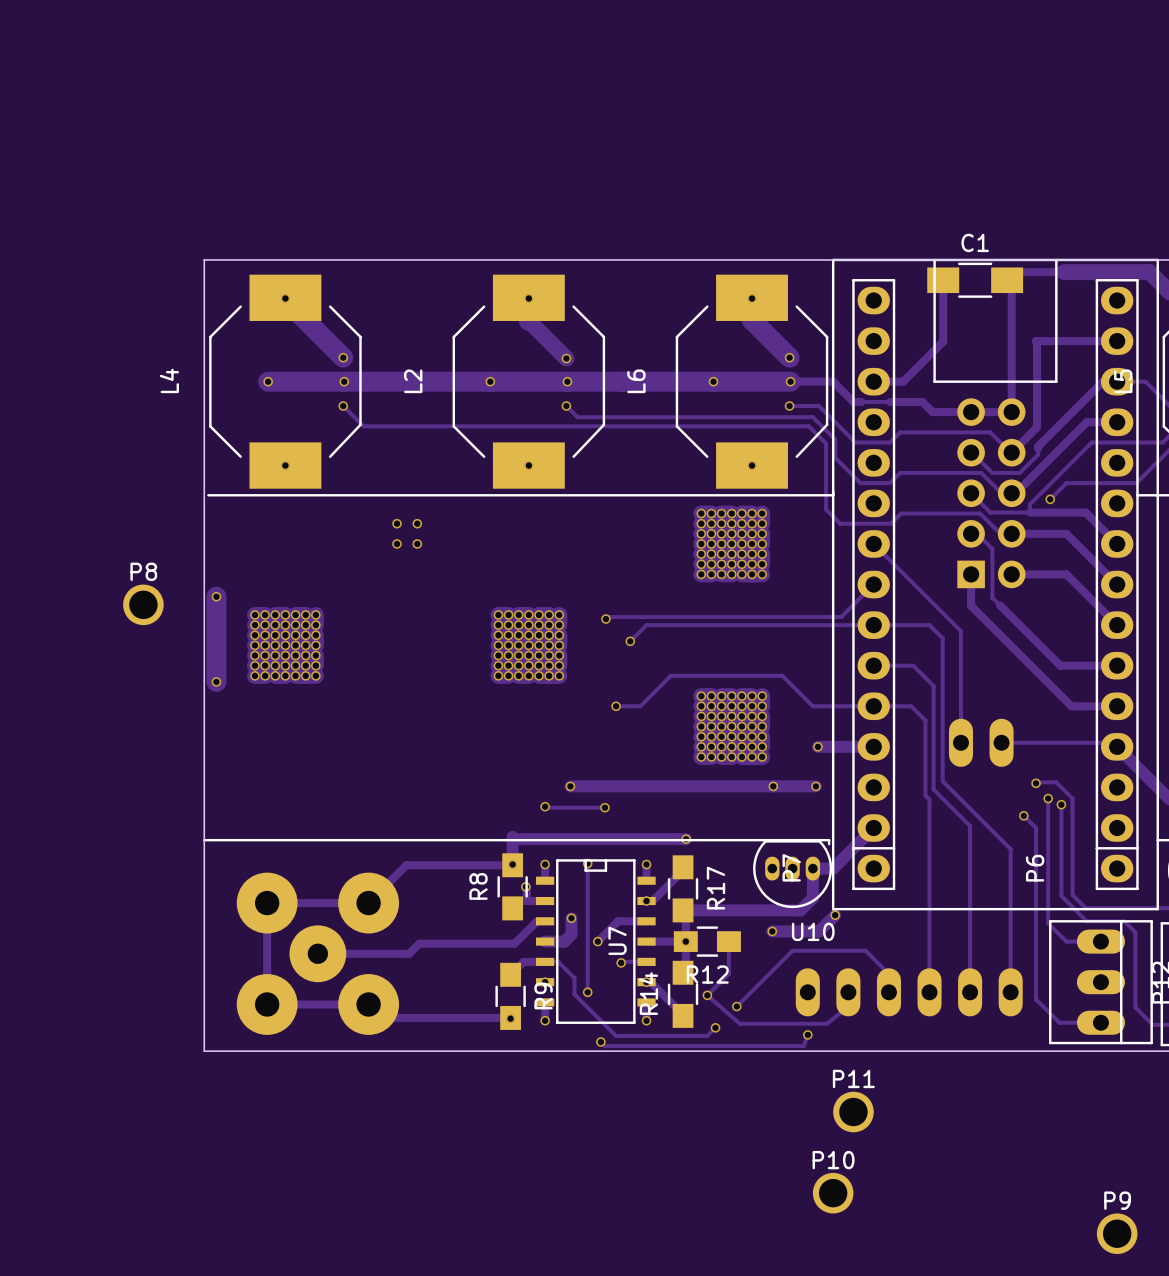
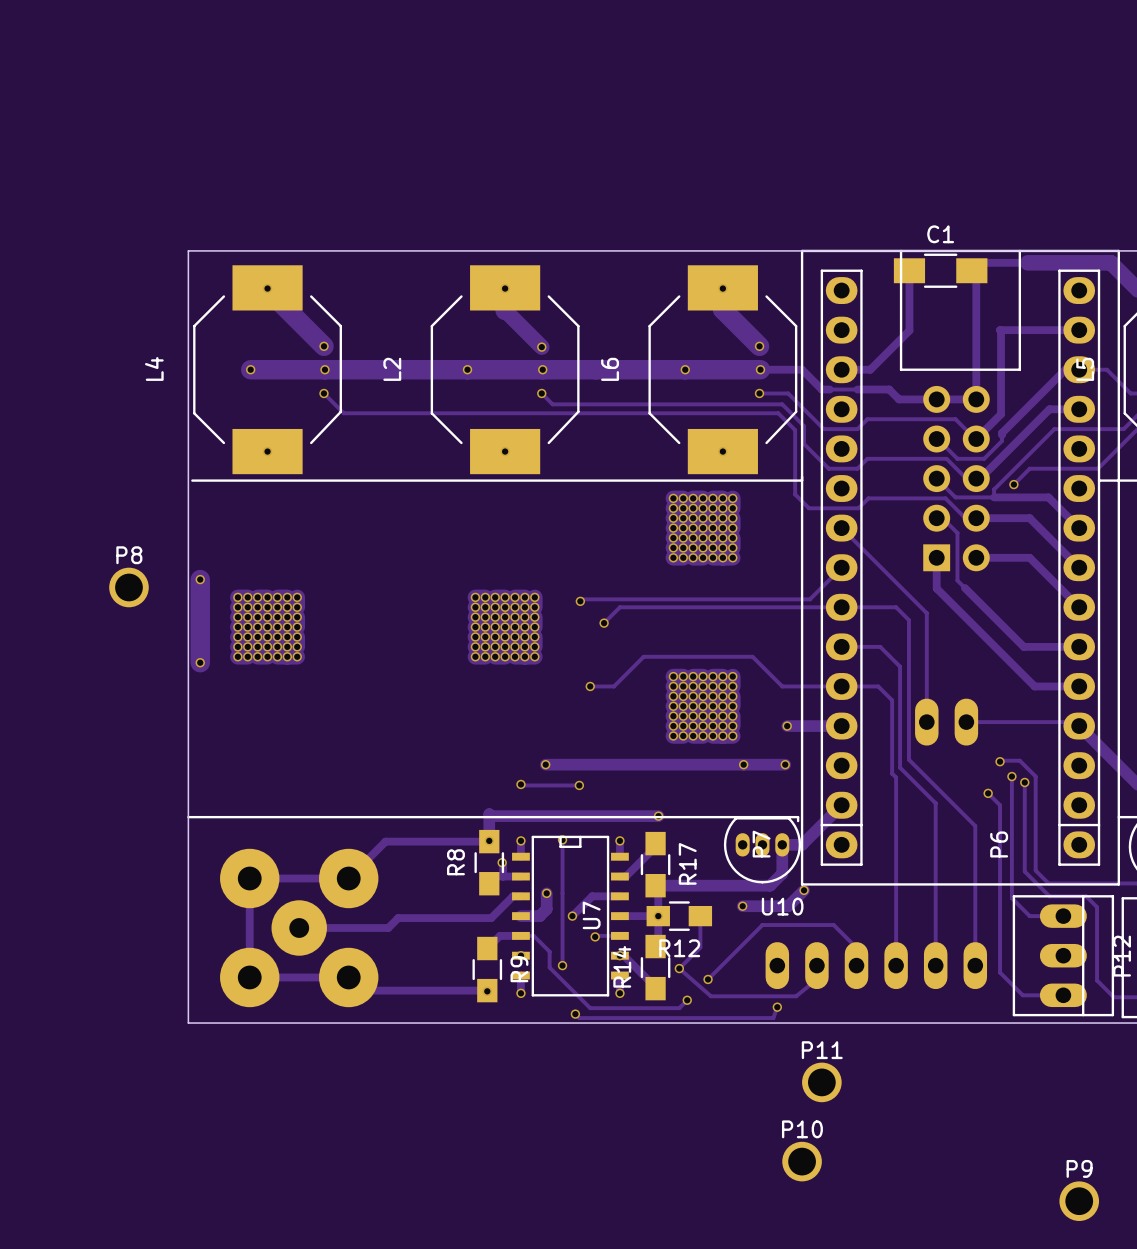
via: (397, 523) -> none
via: (417, 523) -> none
via: (397, 543) -> none
via: (417, 543) -> none
via: (646, 901) -> none

